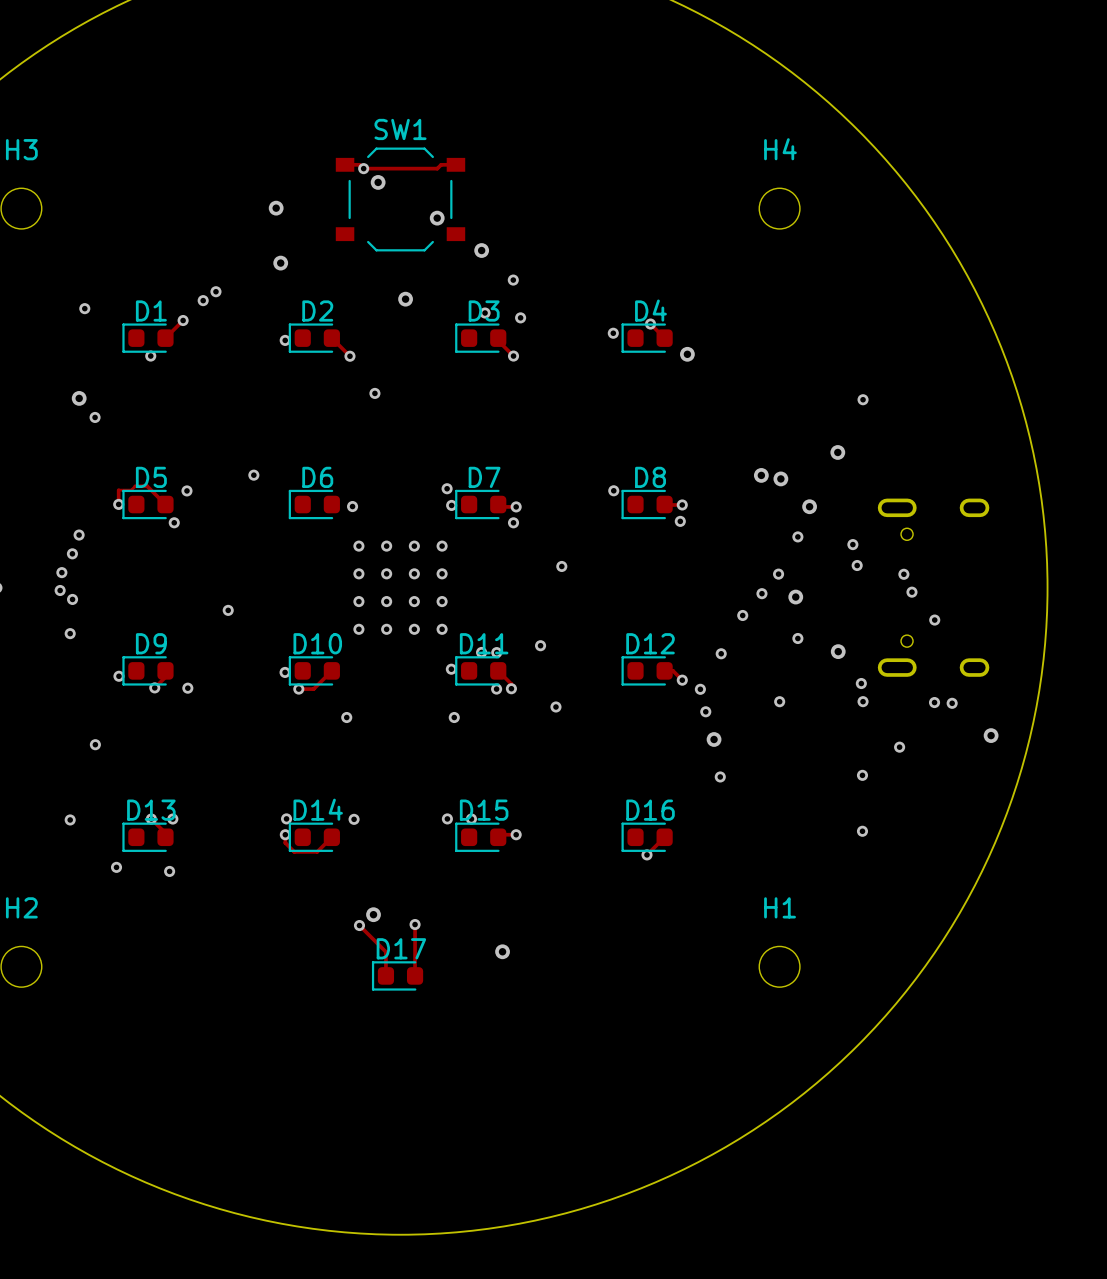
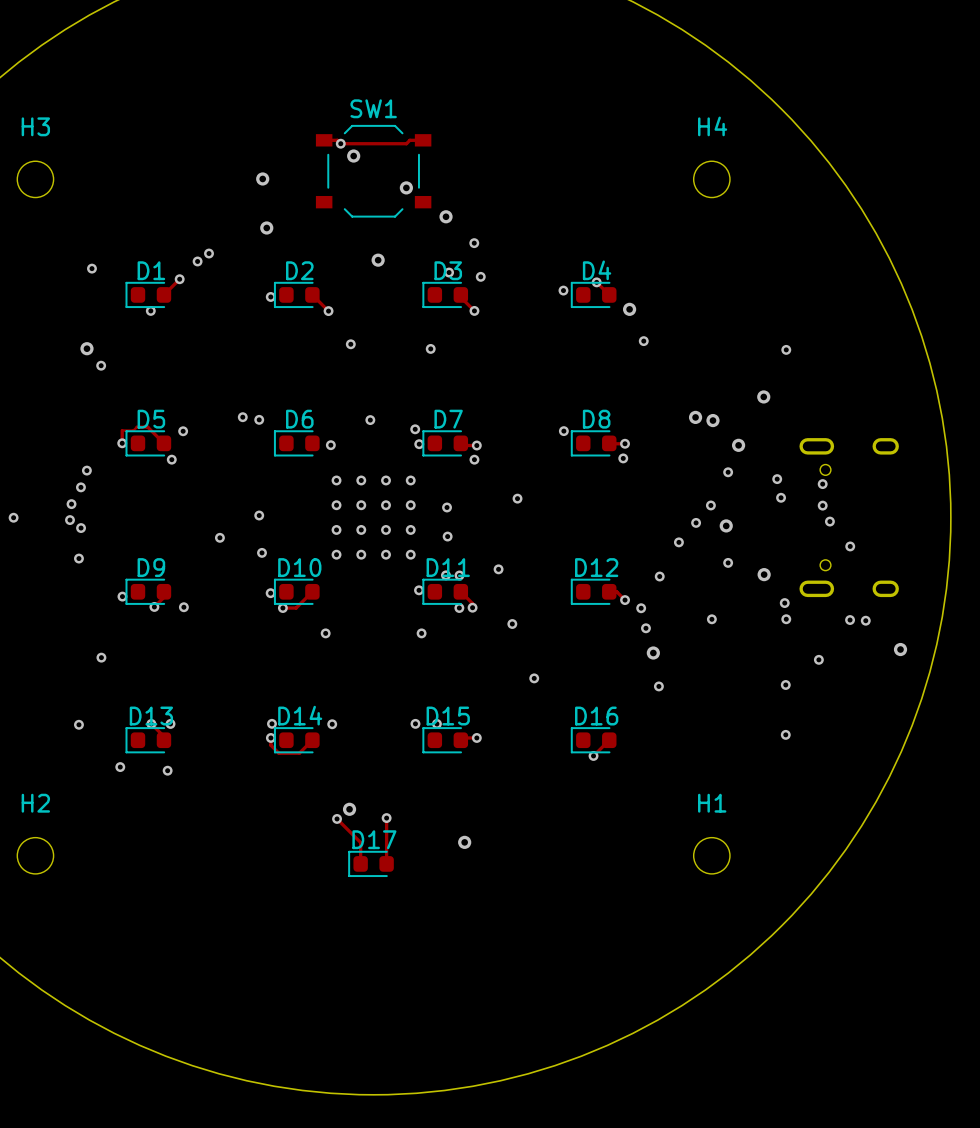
via: none -> (643, 341)
via: none -> (430, 348)
via: none -> (259, 419)
via: none -> (370, 420)
via: none -> (822, 484)
via: none -> (447, 507)
via: none -> (259, 515)
via: none -> (447, 536)
via: none -> (261, 552)
via: none -> (534, 678)

